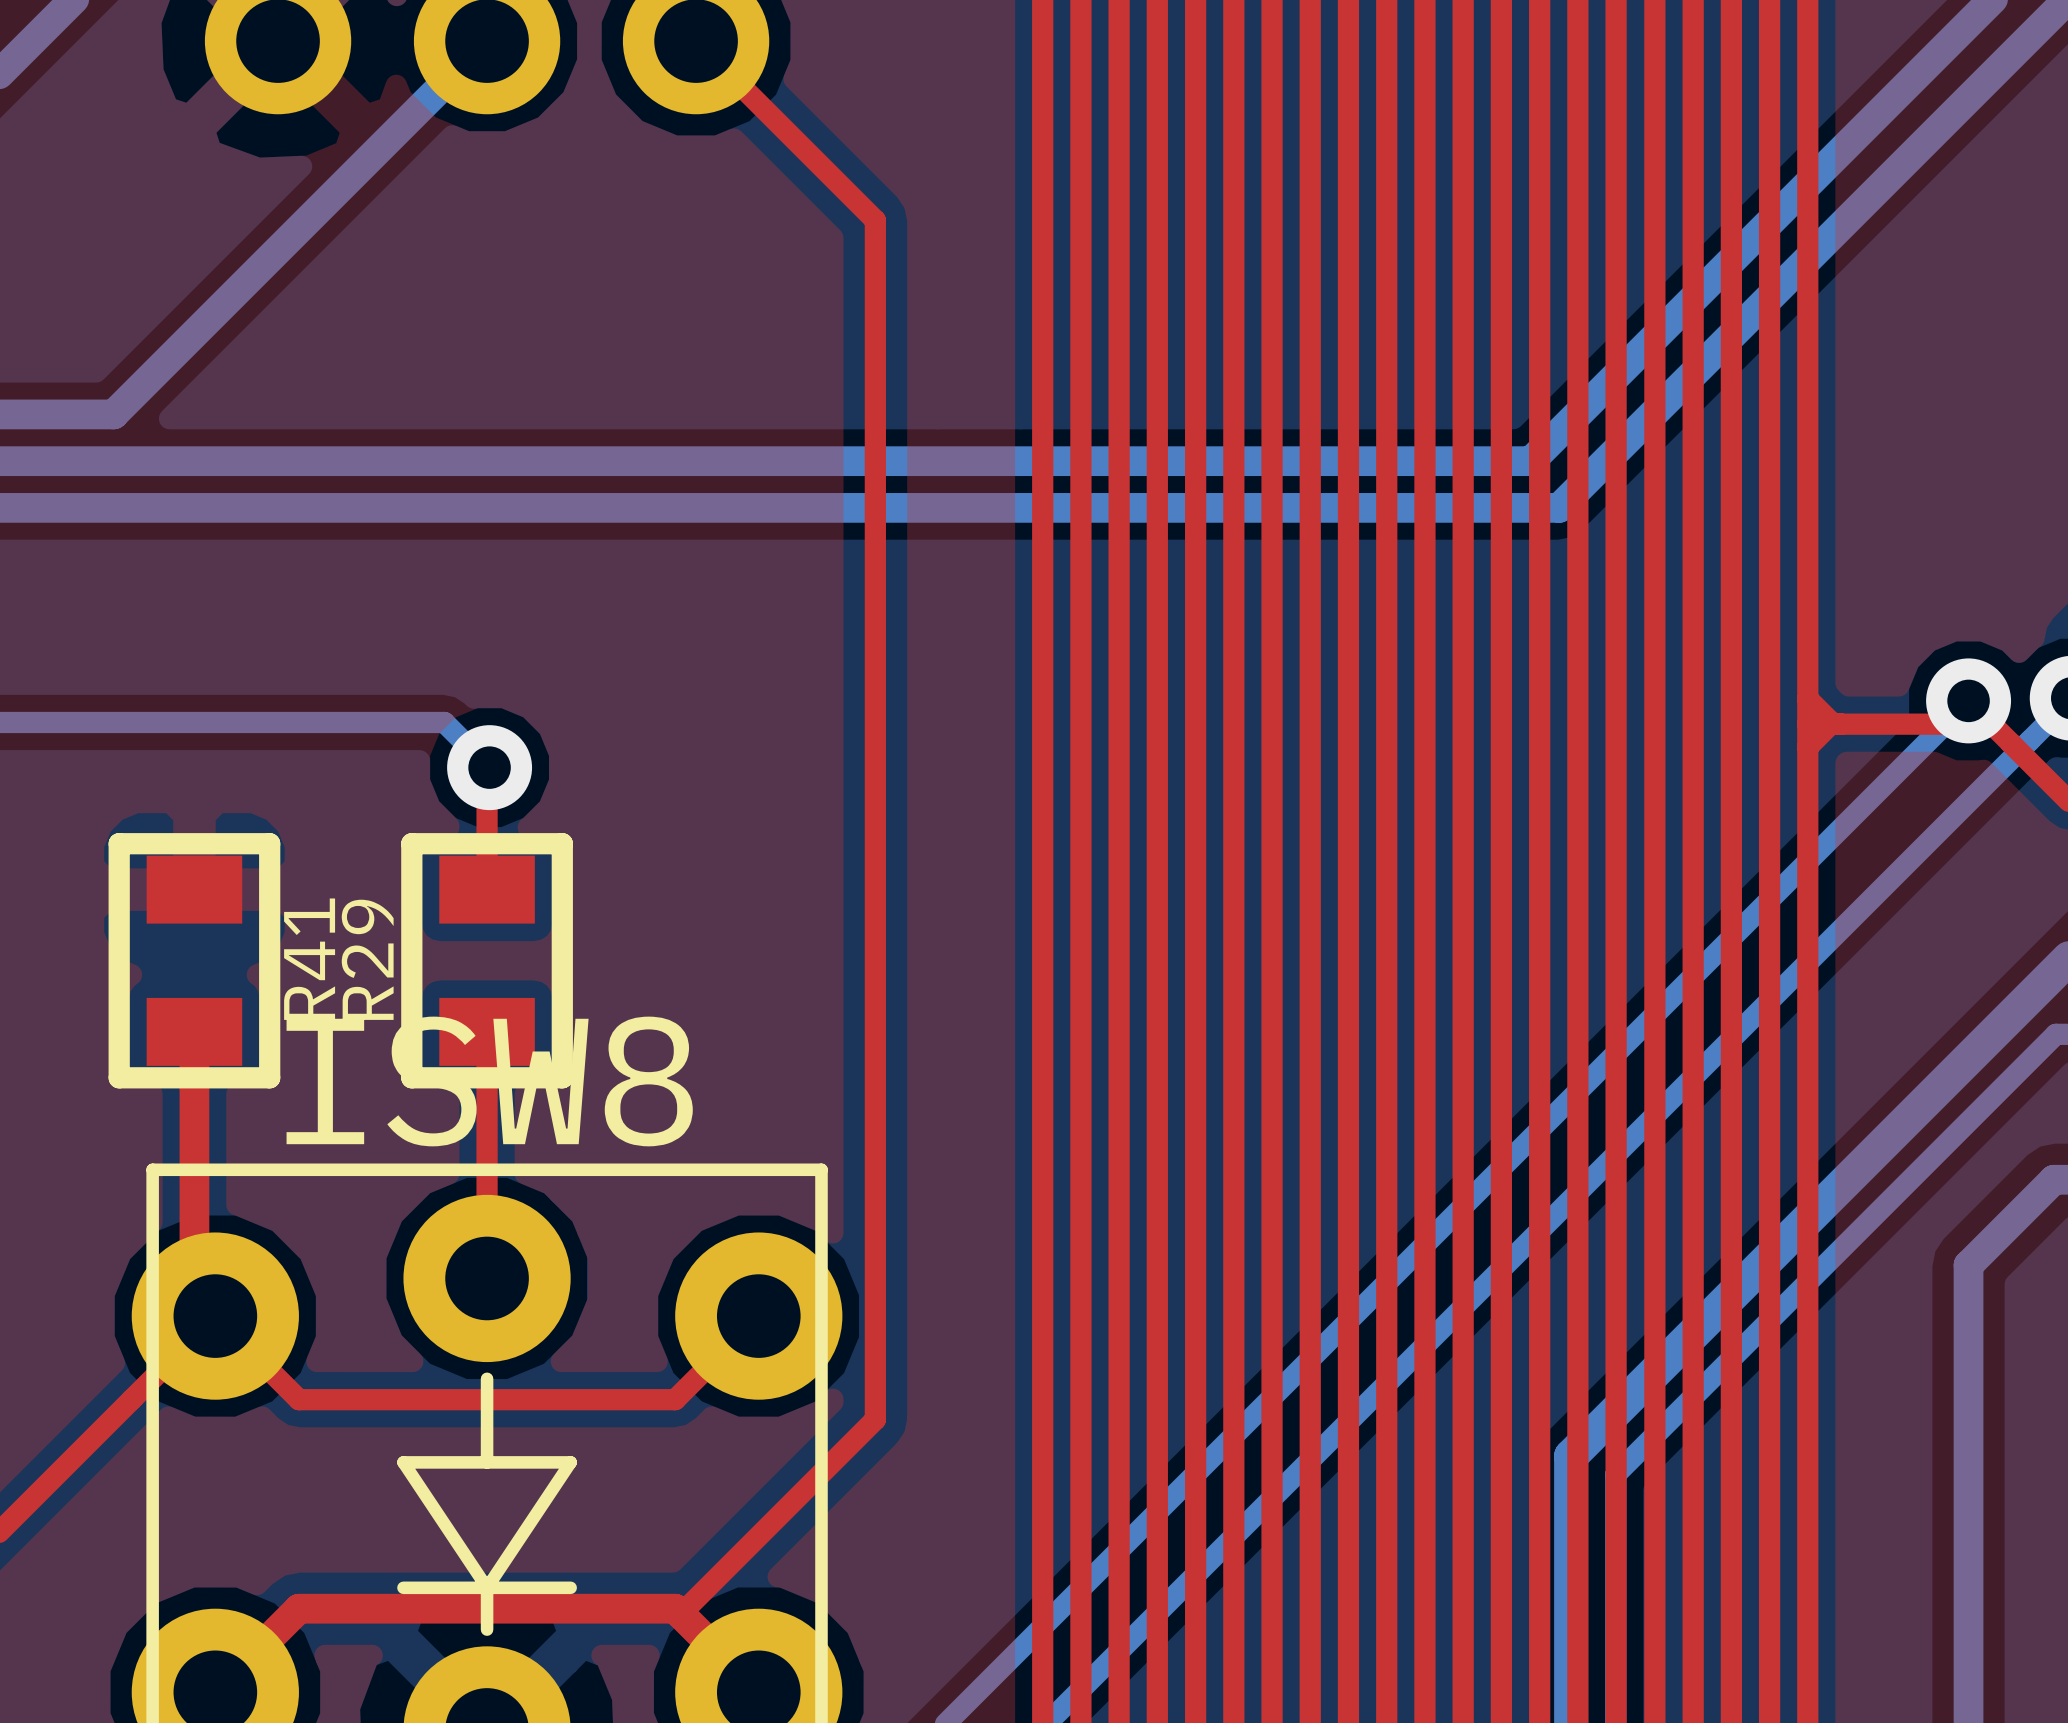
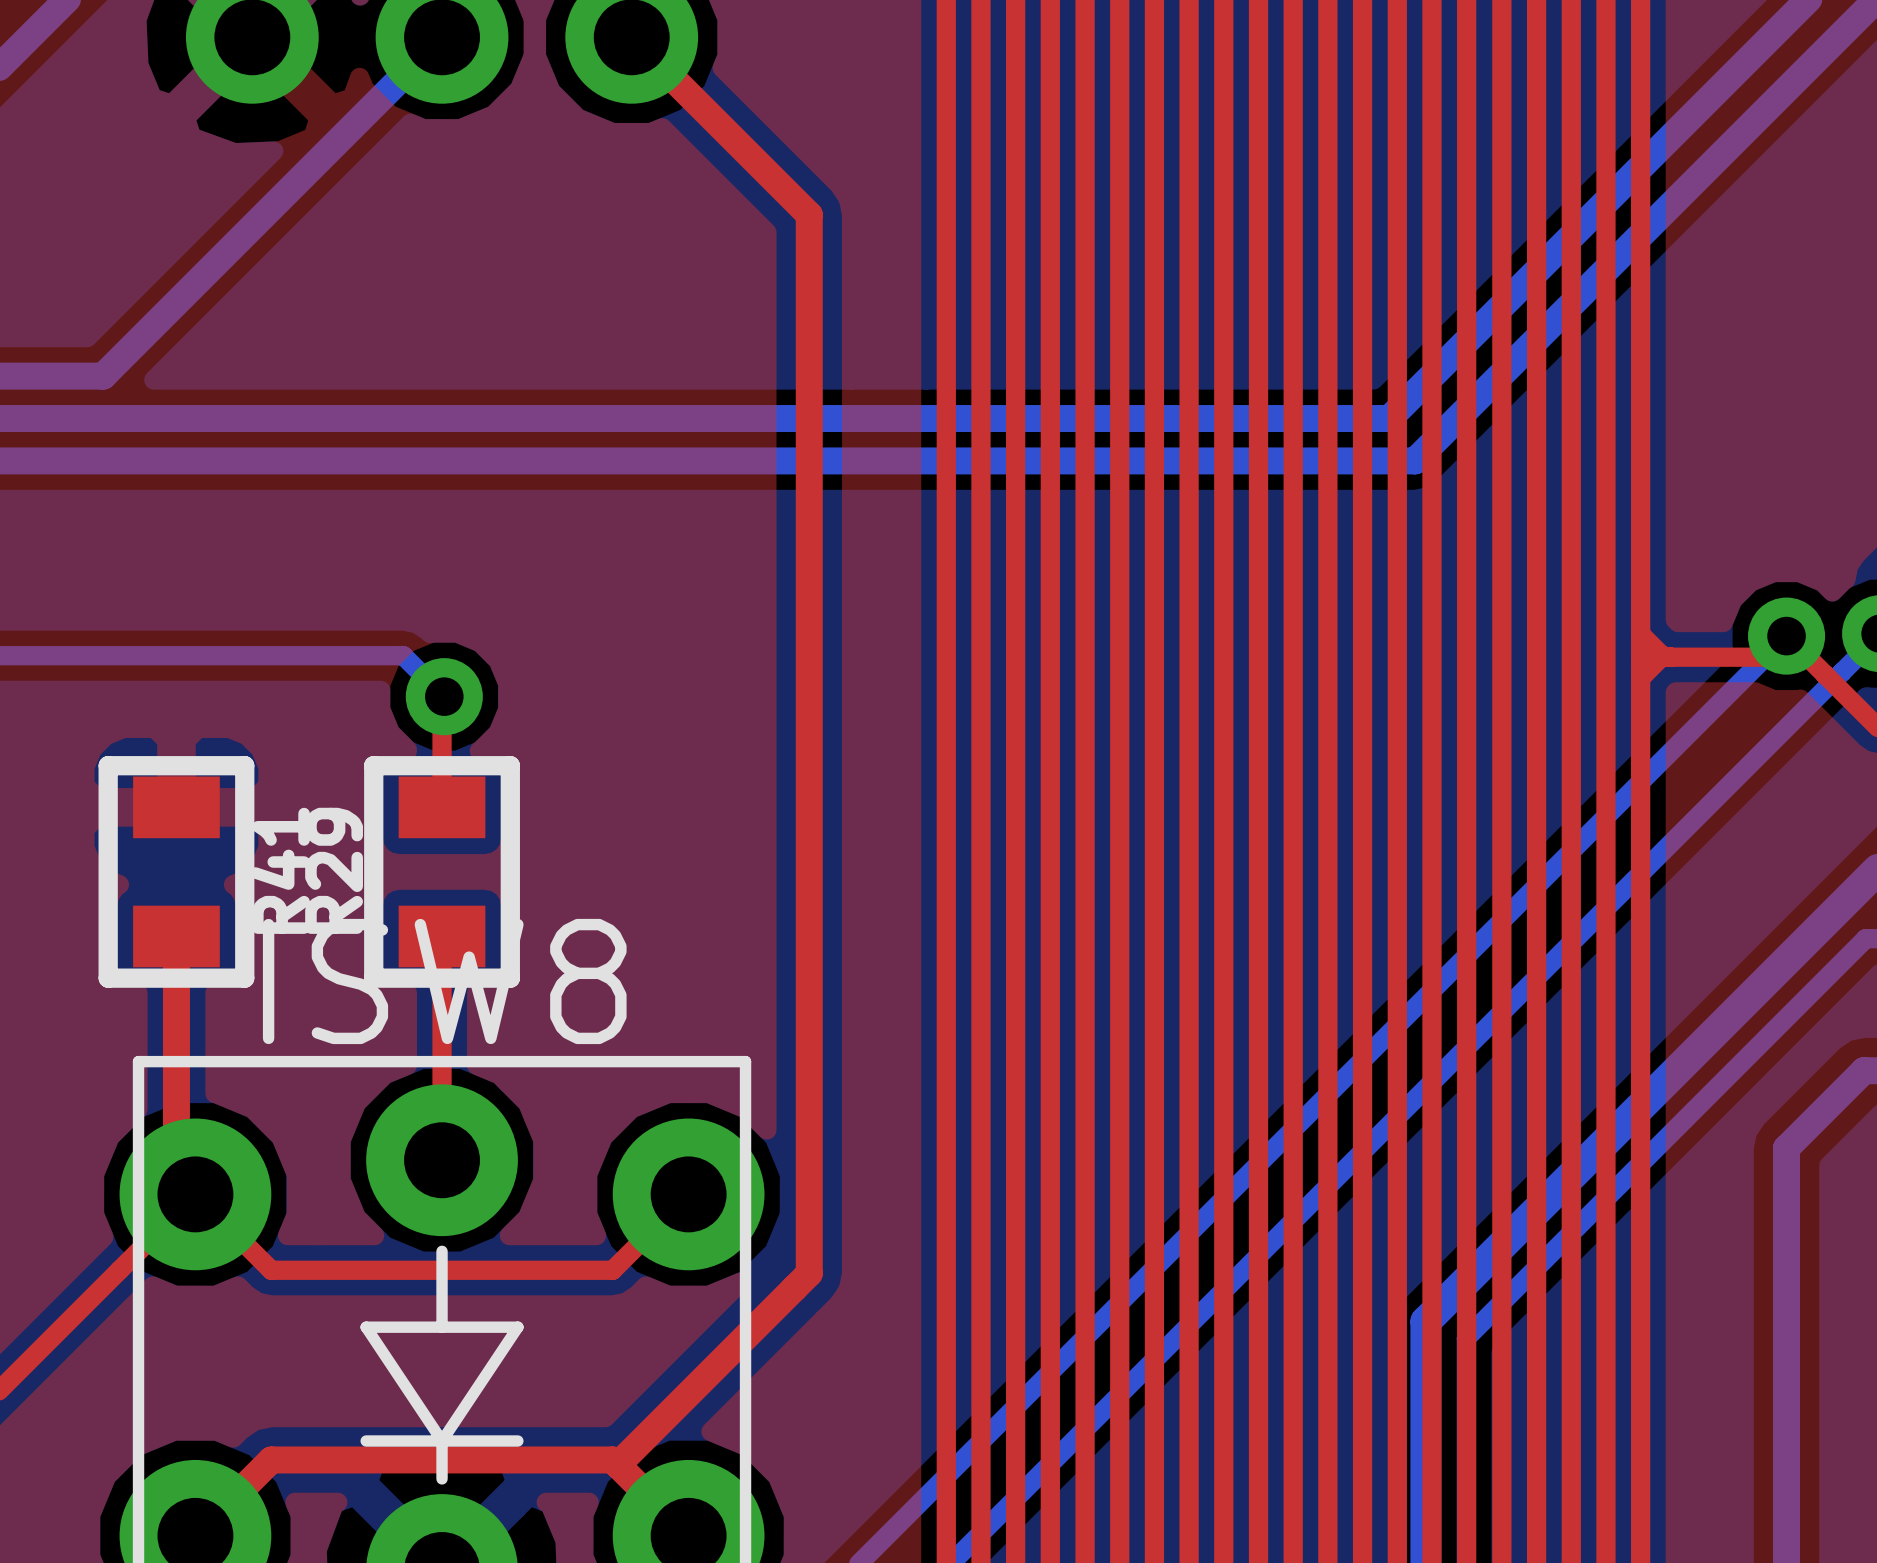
top track width: thin (696, 41) (875, 220) -> thick (631, 37) (794, 199)
top track: (875, 220) (875, 1419) -> (794, 199) (809, 214) (809, 1273) (794, 1288)
top track width: thin (875, 1419) (680, 1614) -> thick (794, 1288) (617, 1464)

